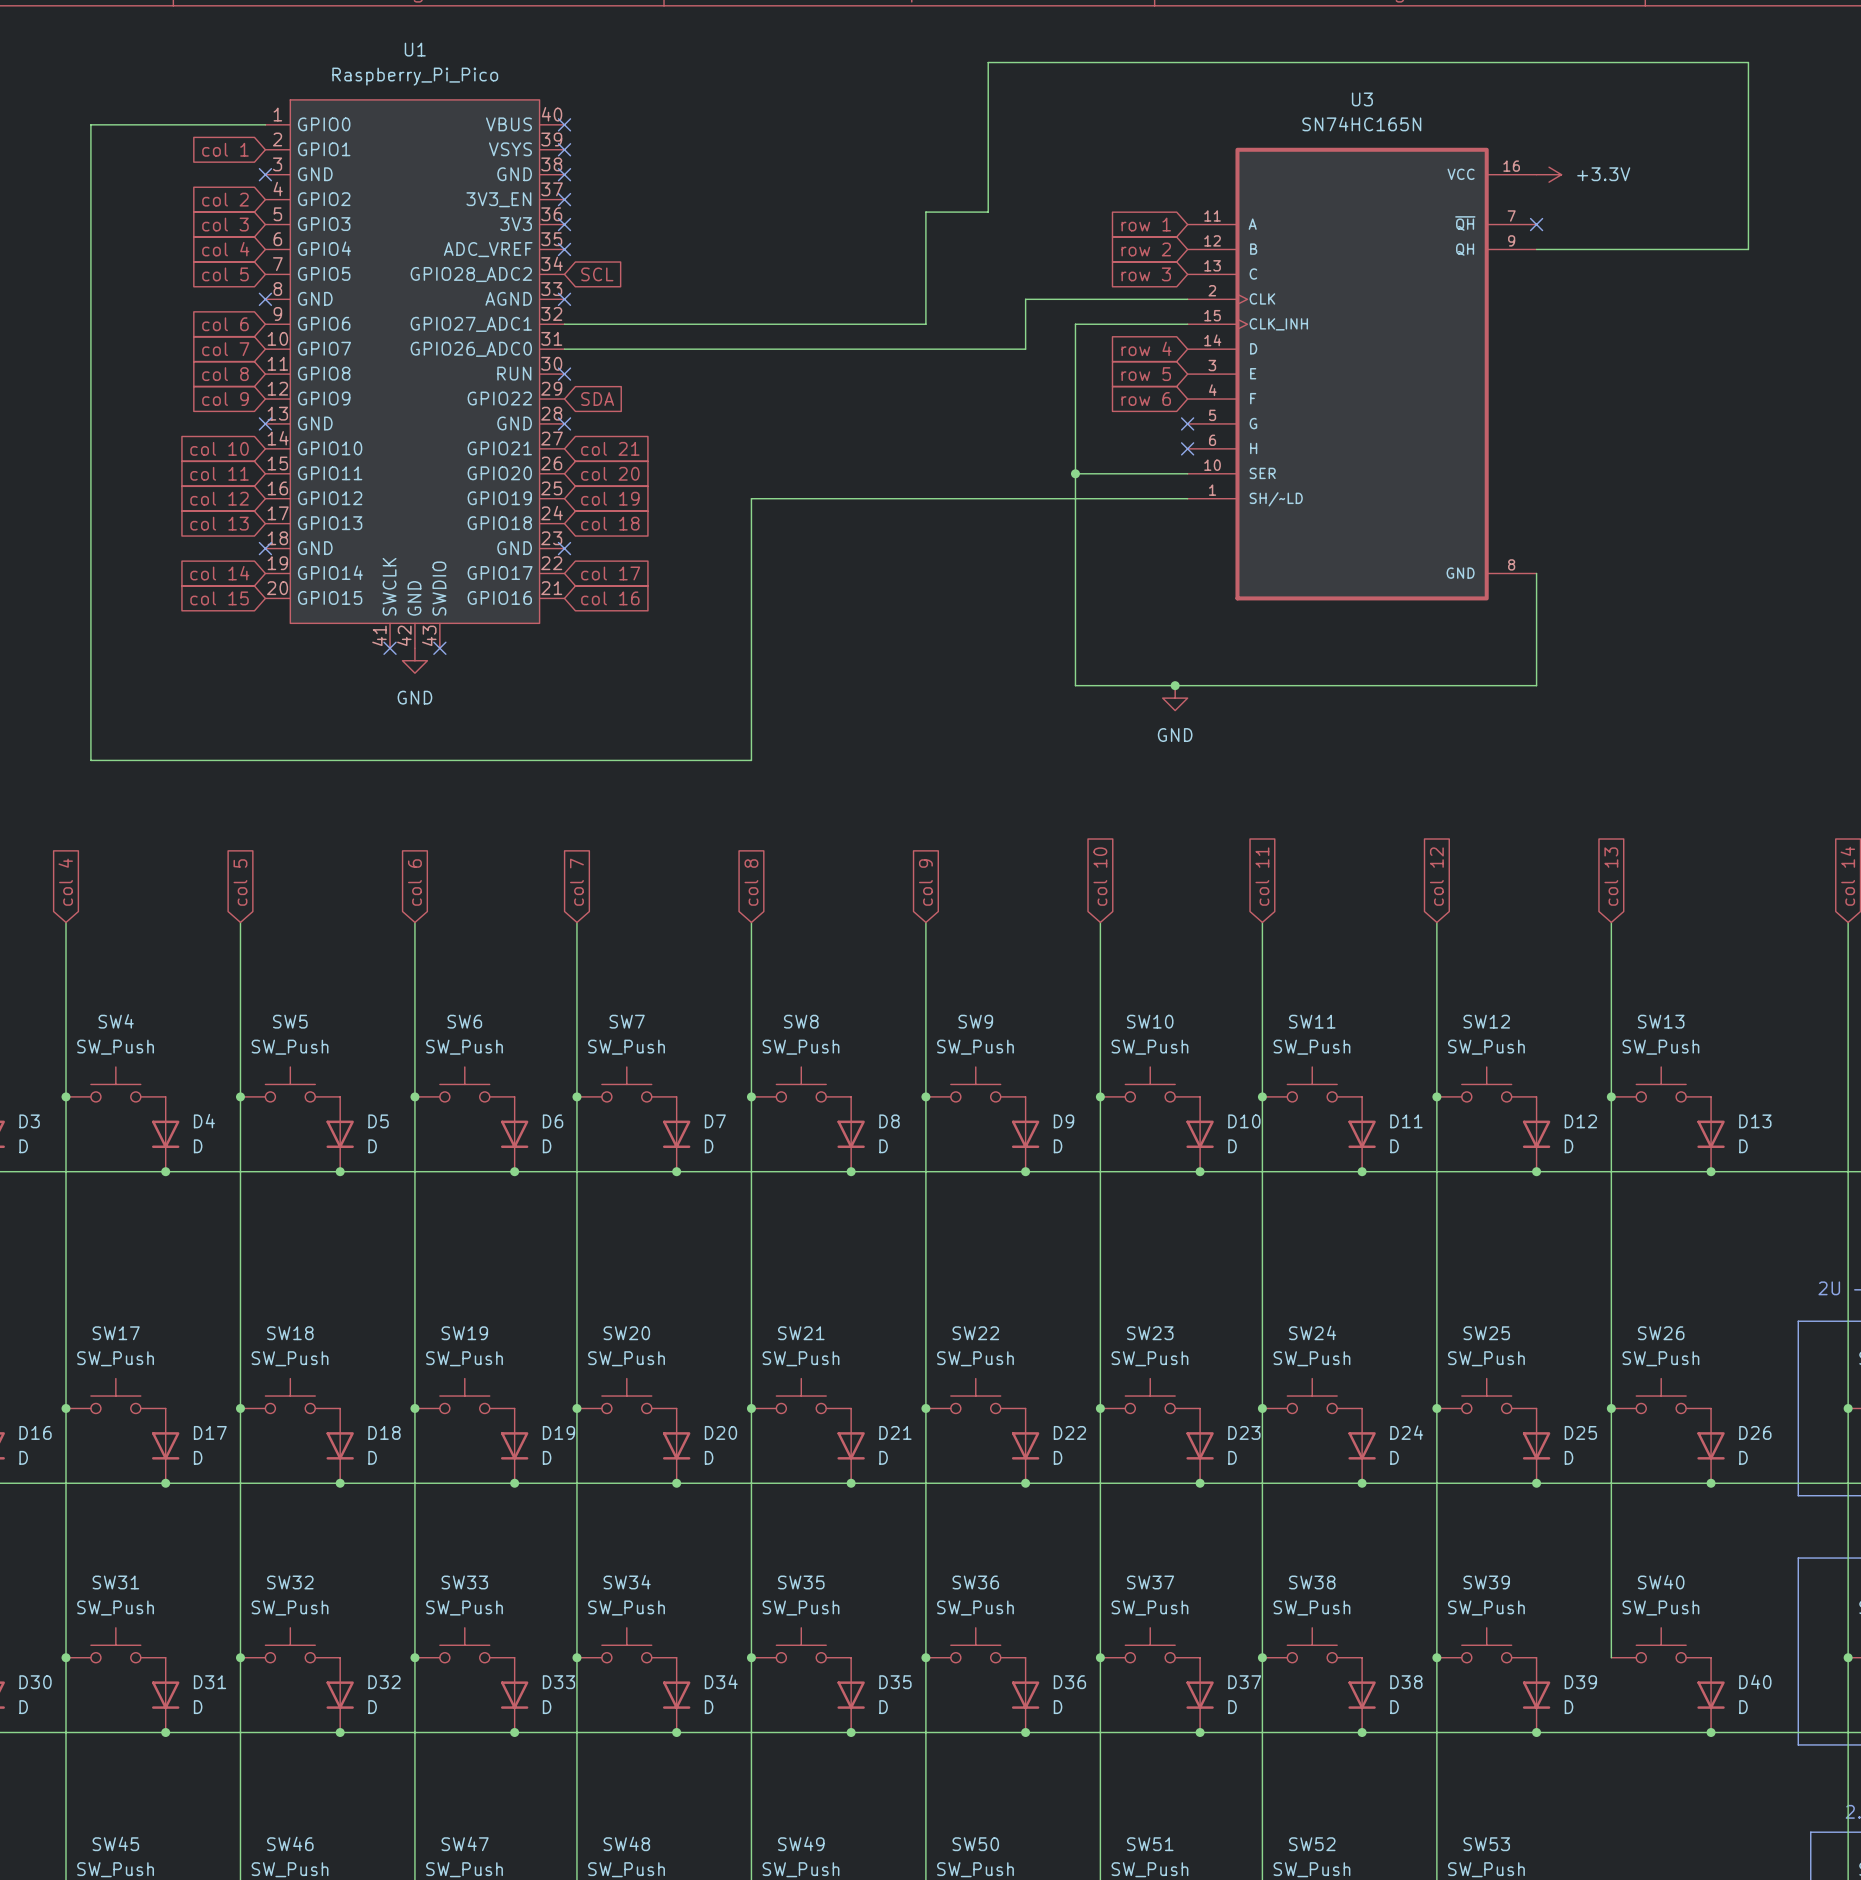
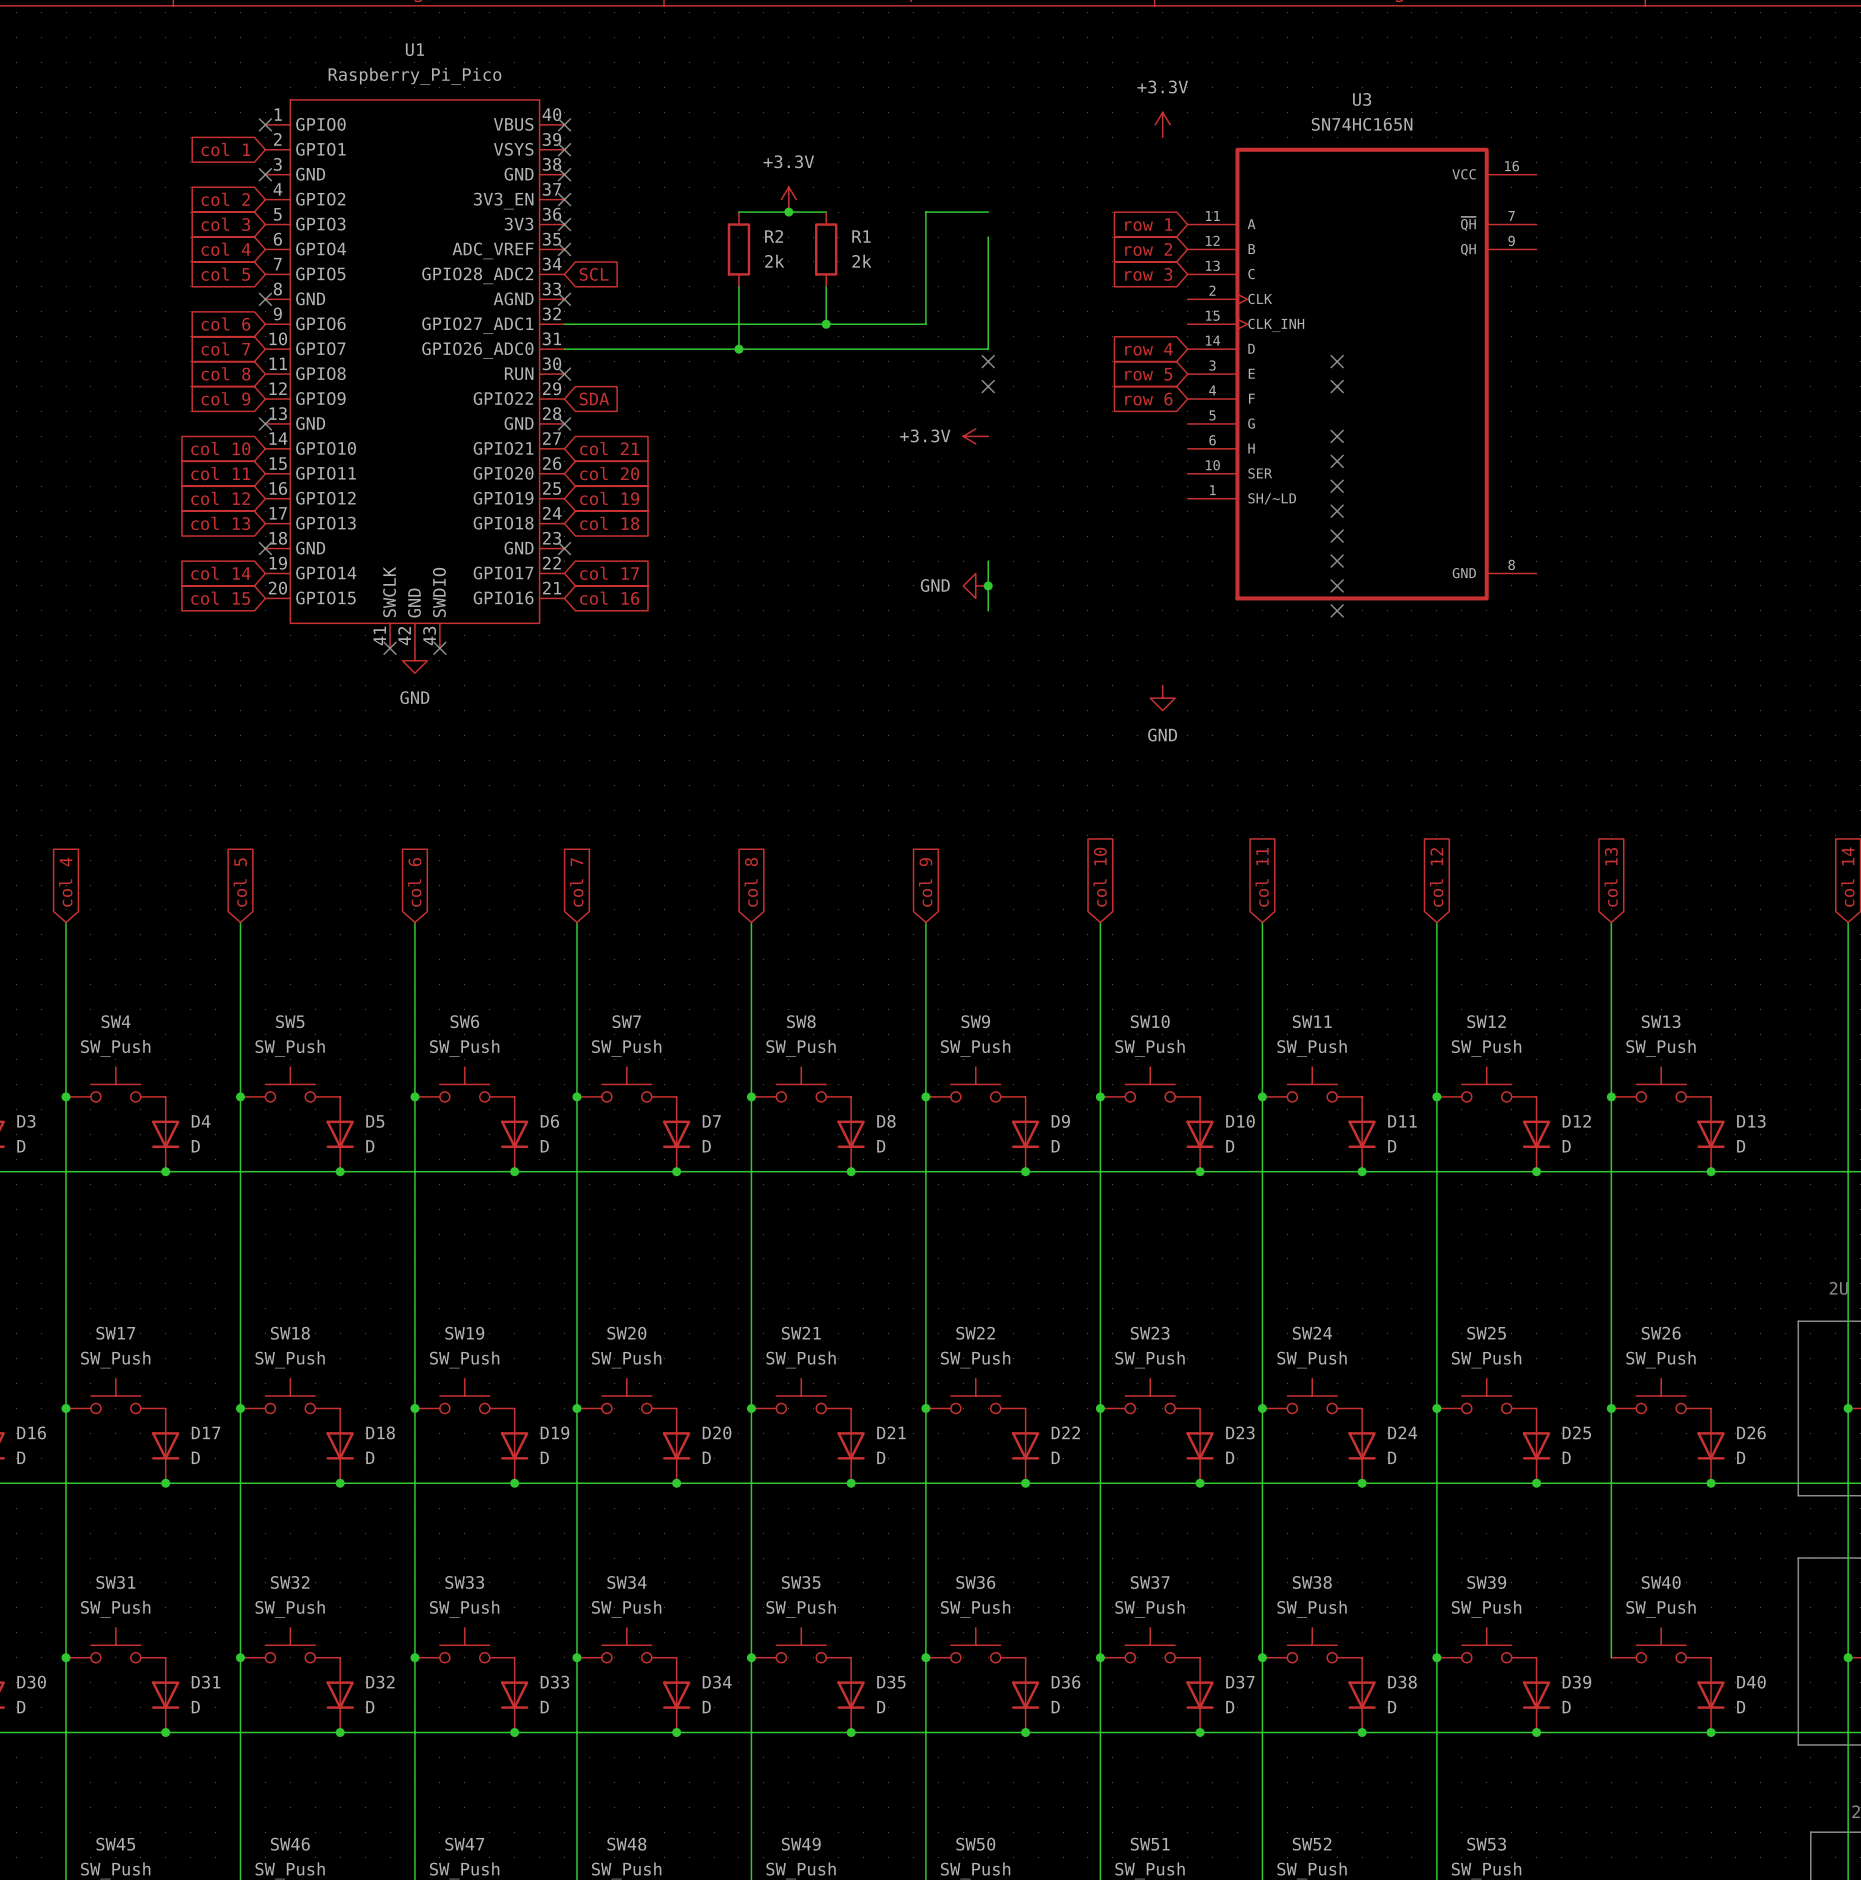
wire: (265, 124) (90, 124) (90, 760) (751, 760) (751, 498) (1187, 498) -> none
no-connect mark: none -> (265, 124)
power symbol: none -> +3.3V (1162, 124)
power symbol: +3.3V (1549, 174) -> none
power symbol: none -> +3.3V (788, 199)
wire: none -> (738, 212) (826, 212)
junction: none -> (788, 212)
wire: (988, 212) (988, 62) (1748, 62) (1748, 249) (1536, 249) -> none
no-connect mark: (1536, 224) -> none
R2: none -> 2k (738, 249)
R1: none -> 2k (826, 249)
wire: none -> (738, 286) (738, 349)
wire: none -> (826, 286) (826, 324)
wire: (1187, 299) (1025, 299) (1025, 349) (988, 349) -> (988, 237) (988, 349)
junction: none -> (826, 324)
wire: (1187, 324) (1075, 324) (1075, 685) (1536, 685) (1536, 573) -> none
junction: none -> (738, 349)
no-connect mark: none -> (988, 361)
no-connect mark: none -> (1337, 361)
no-connect mark: none -> (988, 386)
no-connect mark: none -> (1337, 386)
no-connect mark: (1187, 423) -> none
power symbol: none -> +3.3V (975, 436)
no-connect mark: none -> (1337, 436)
no-connect mark: (1187, 448) -> none
no-connect mark: none -> (1337, 461)
wire: (1075, 473) (1187, 473) -> none
junction: (1075, 473) -> none
no-connect mark: none -> (1337, 486)
no-connect mark: none -> (1337, 511)
no-connect mark: none -> (1337, 536)
wire: none -> (988, 561) (988, 610)
no-connect mark: none -> (1337, 561)
power symbol: none -> GND (975, 585)
junction: none -> (988, 585)
no-connect mark: none -> (1337, 585)
no-connect mark: none -> (1337, 610)
junction: (1175, 685) -> none
power symbol position: GND (1175, 698) -> GND (1162, 698)

